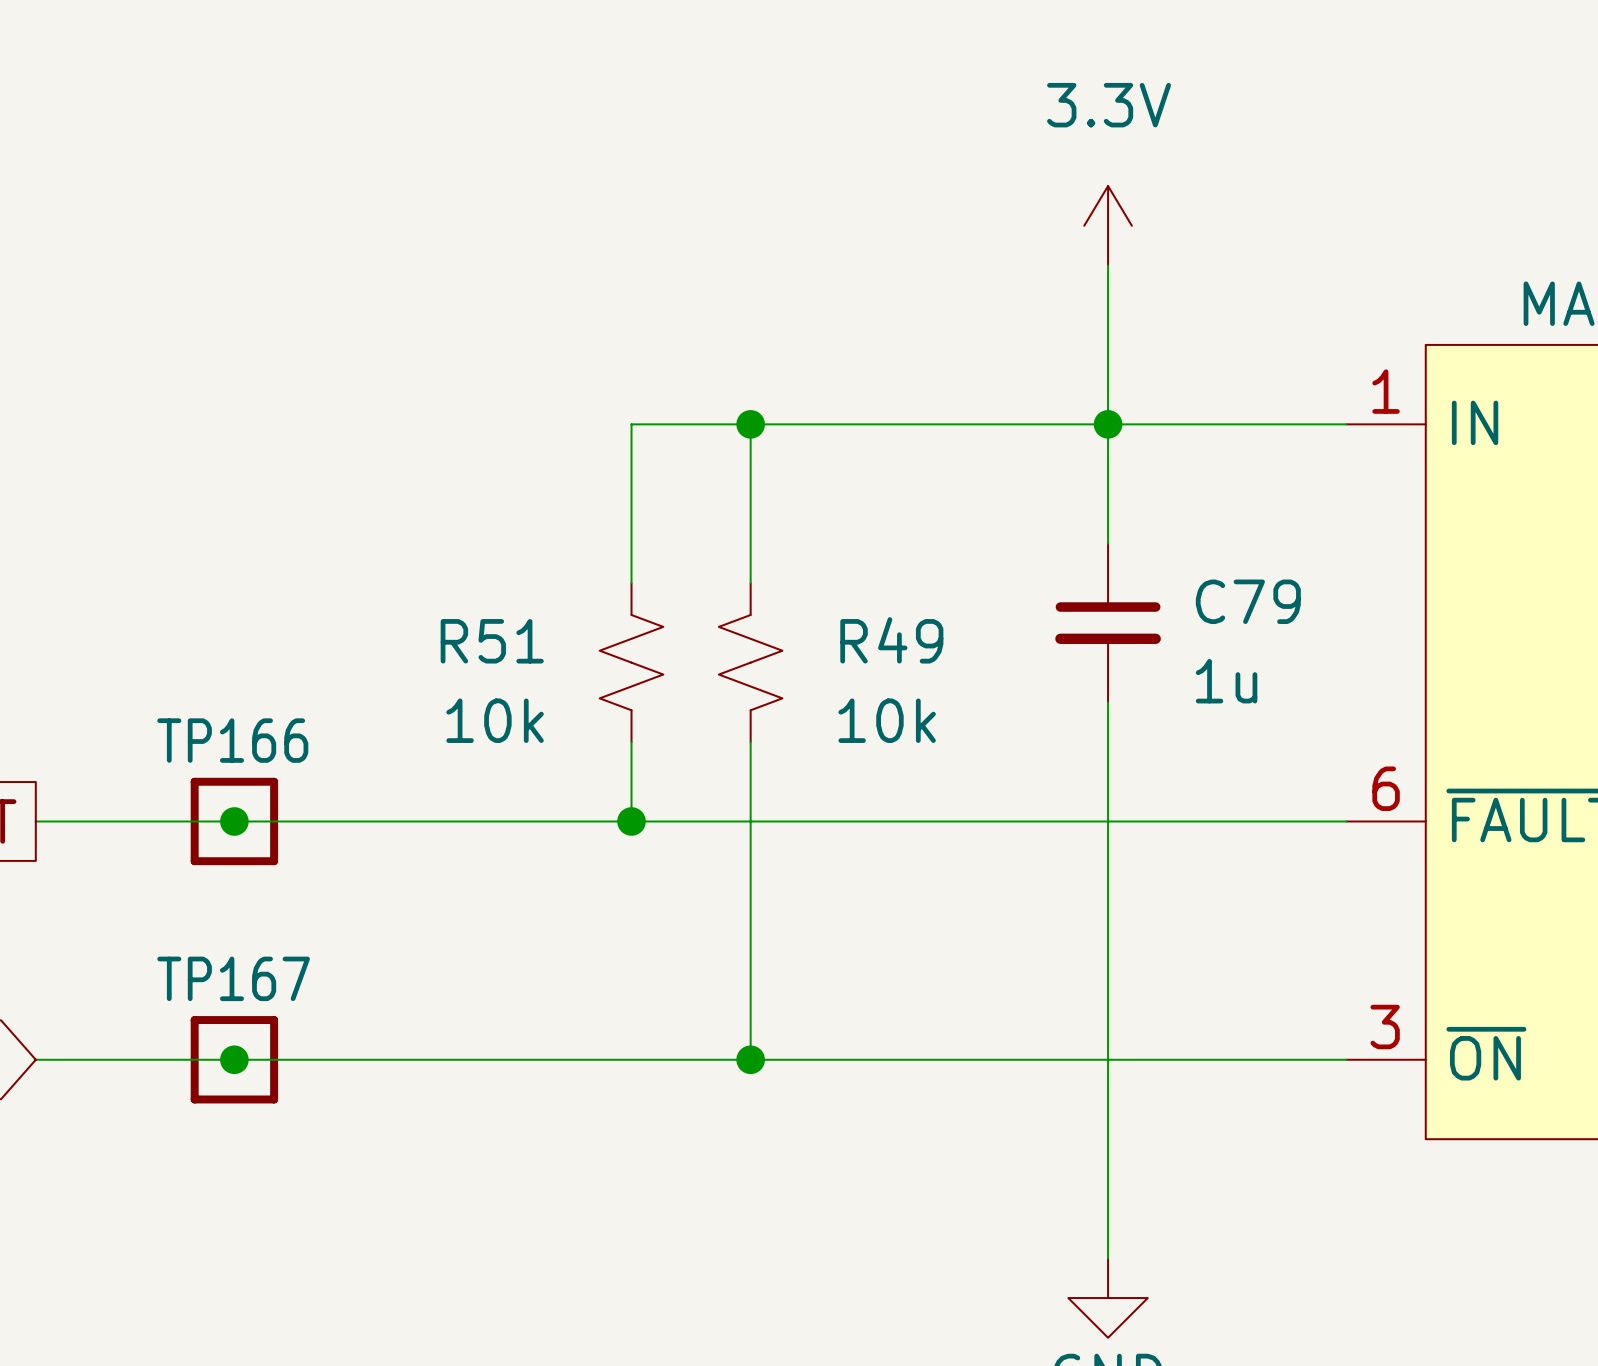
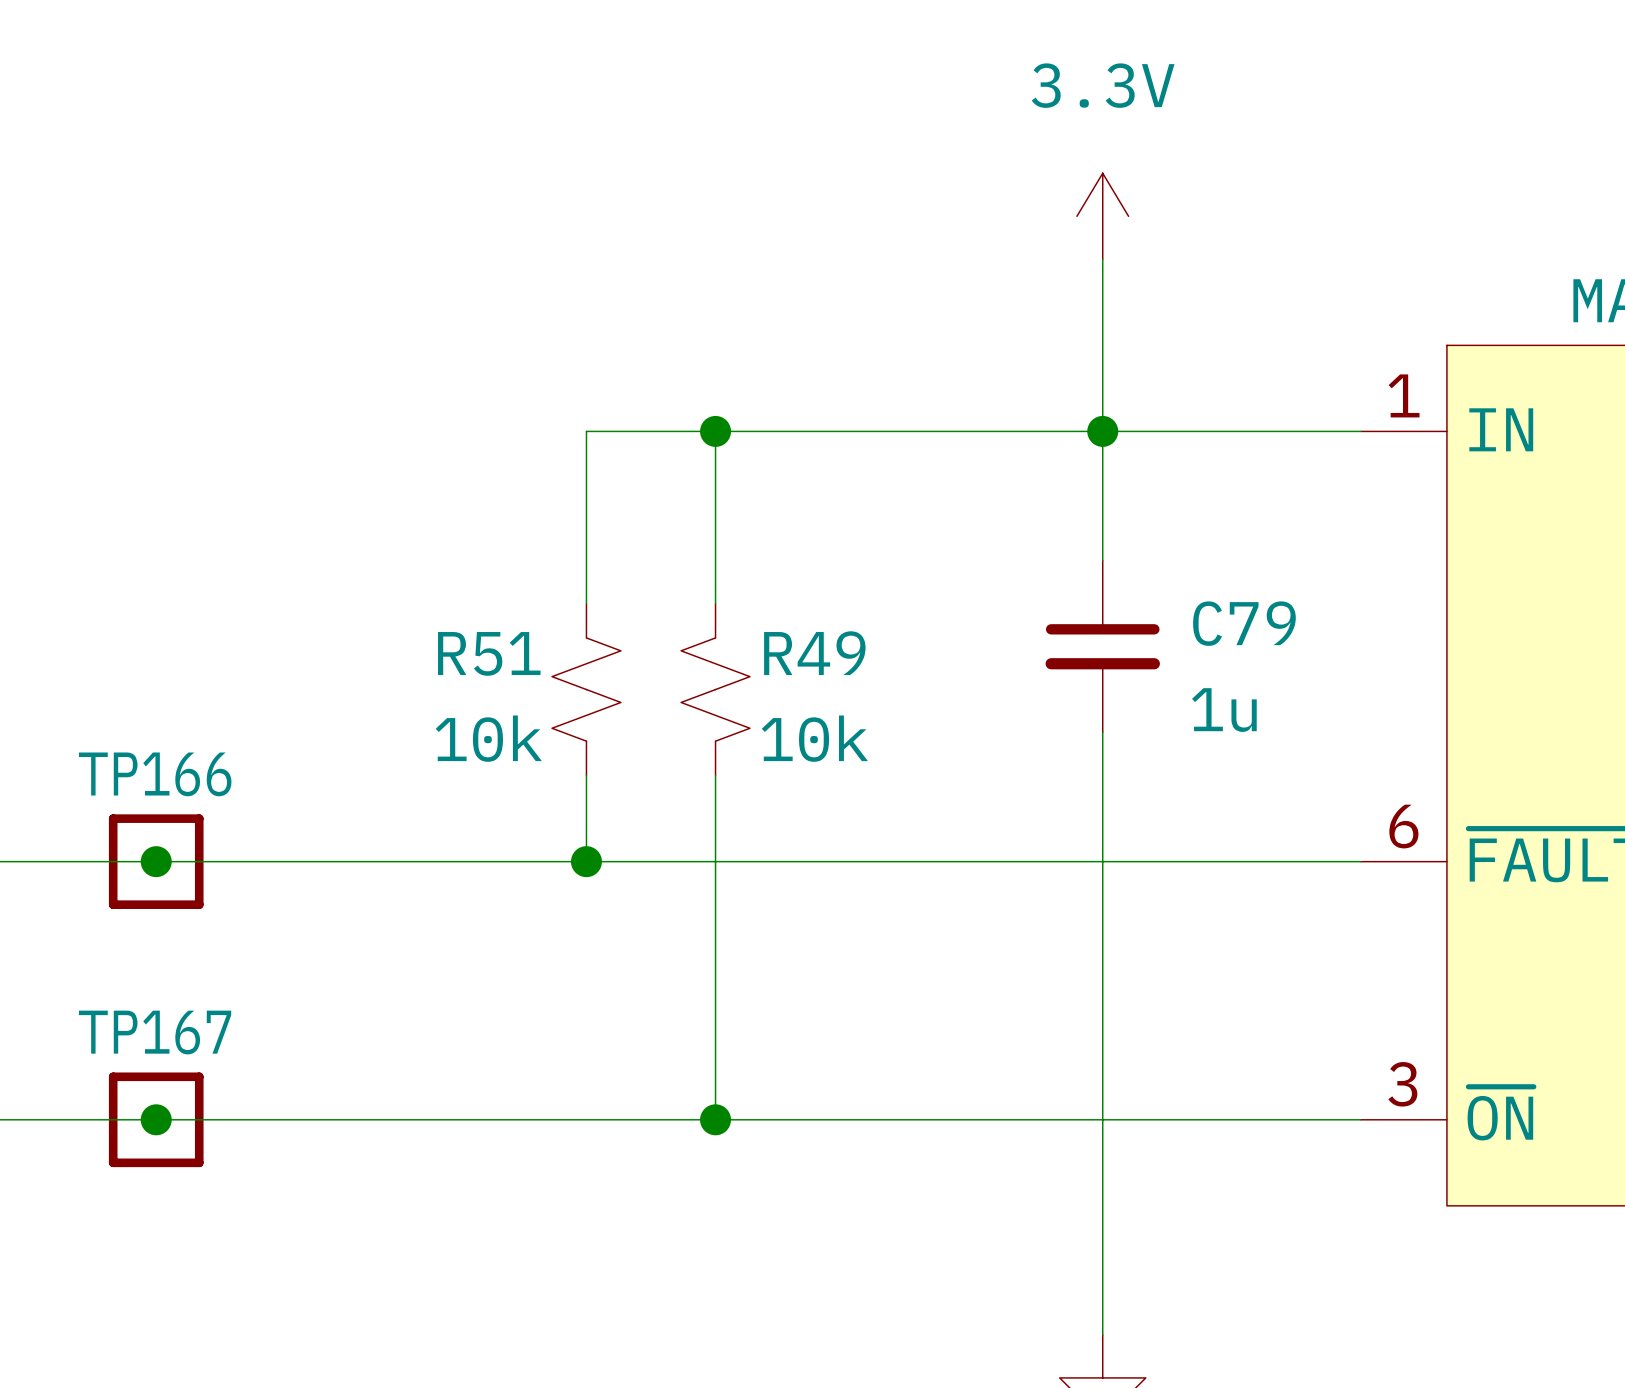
R49 name position: R49 (891, 640) -> R49 (814, 653)
R51 name position: R51 (492, 641) -> R51 (489, 653)
R51 value position: 10k (495, 720) -> 10k (488, 738)
R49 value position: 10k (887, 720) -> 10k (814, 738)

